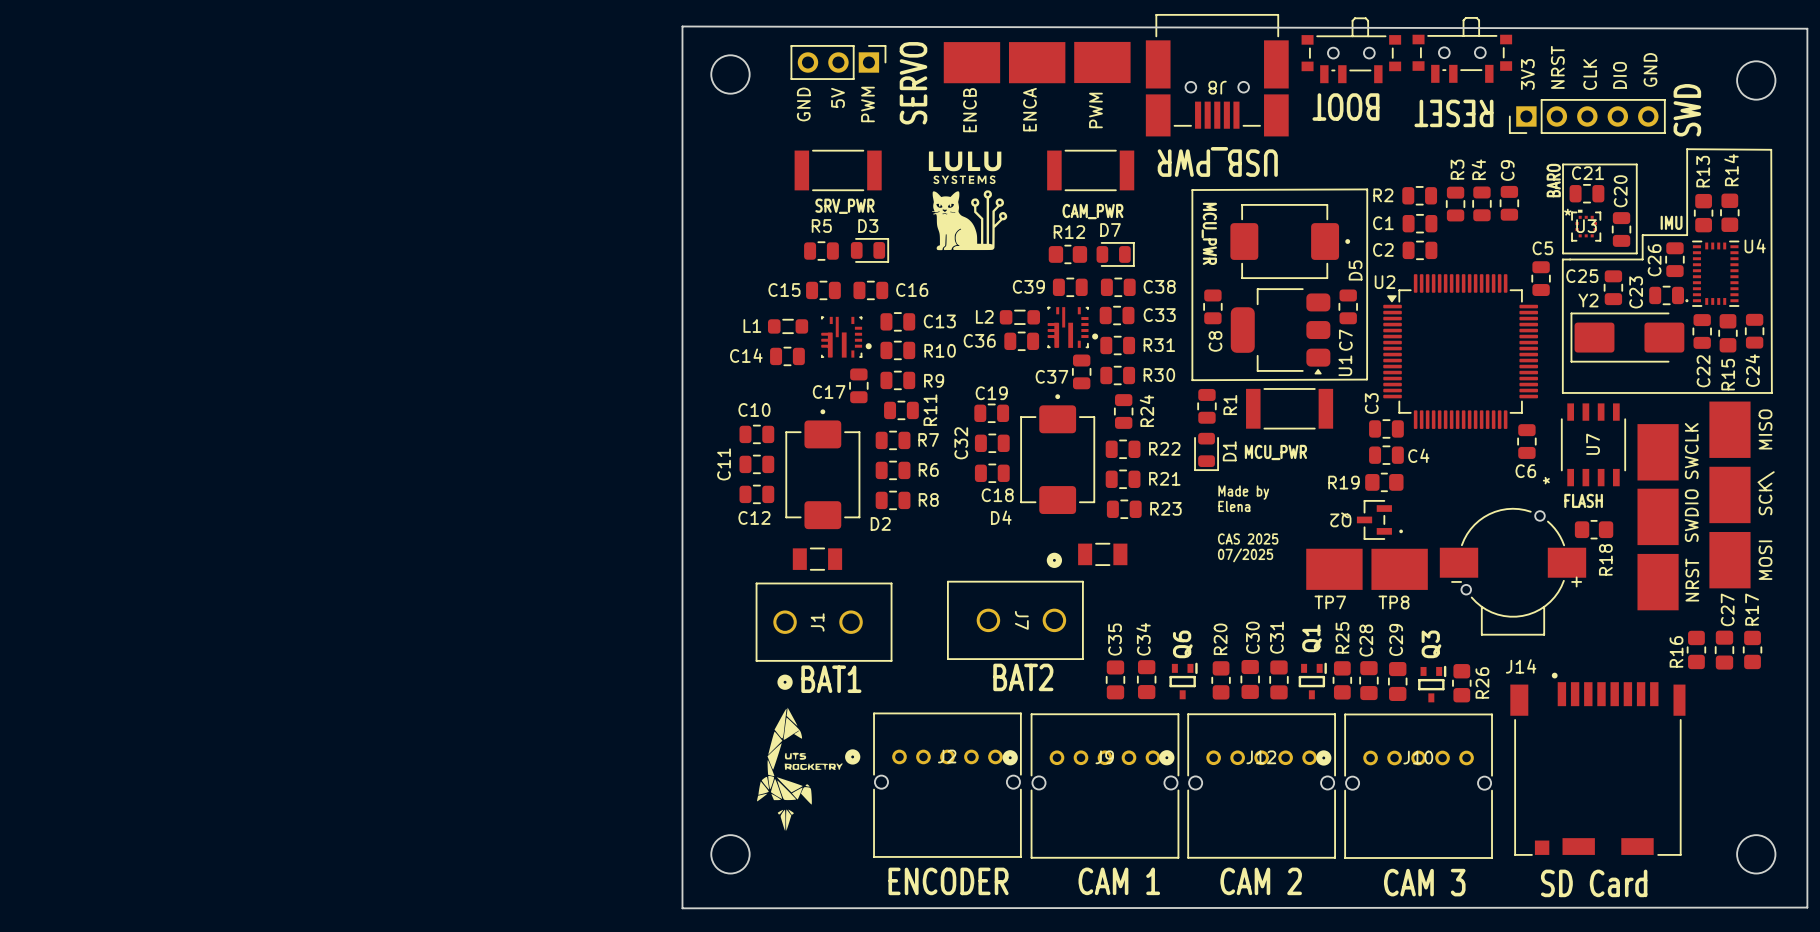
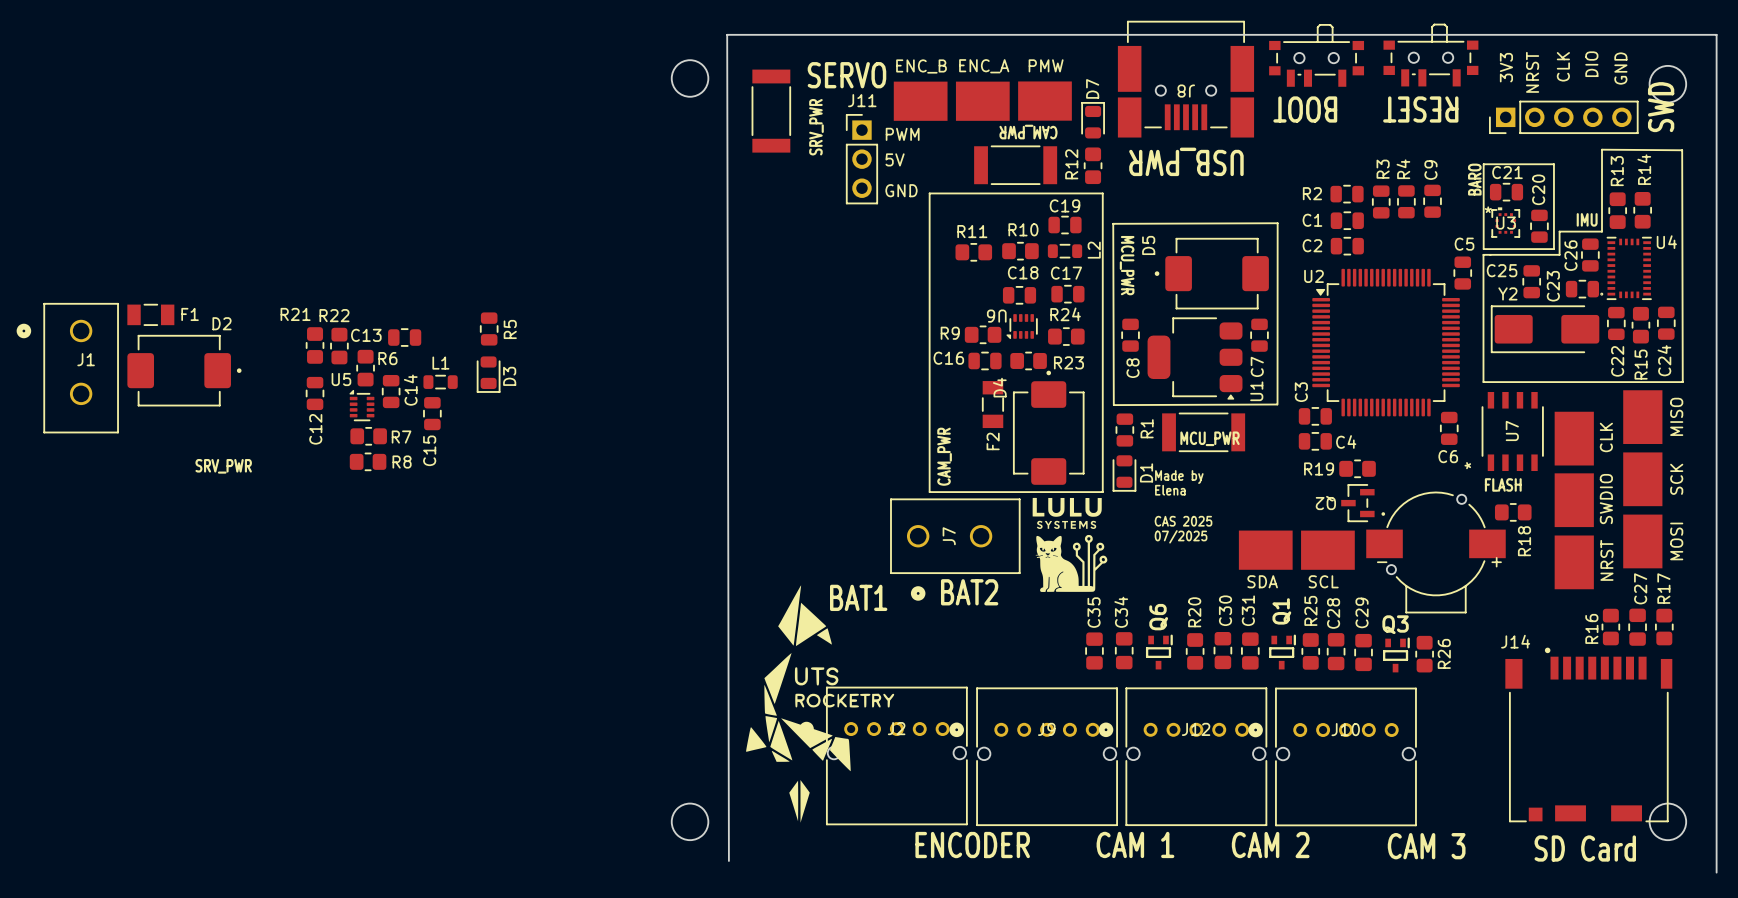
board edge: (1807, 28) (682, 26) (682, 908) (1807, 907) -> (1716, 34) (727, 34) (728, 861)
part position: (1351, 50) -> (1316, 55)
part: (1462, 50) -> none
part: none -> (1430, 55)
part: (838, 62) -> none
ENCB: (971, 62) -> none
ENCA: (1037, 62) -> none
PWM: (1102, 62) -> none
text position: NRST (1557, 67) -> NRST (1532, 72)
text position: GND (1650, 69) -> GND (1620, 68)
text position: 3V3 (1527, 74) -> 3V3 (1506, 67)
text position: CLK (1590, 74) -> CLK (1563, 66)
J8 position: (1217, 75) -> (1185, 79)
text position: DIO (1620, 75) -> DIO (1591, 64)
text rotation: 0° (913, 83) -> 90° clockwise (846, 75)
text rotation: 0° (838, 97) -> 90° clockwise (895, 159)
text position: 5V (838, 97) -> 5V (895, 159)
ENC_B: none -> (920, 101)
ENC_A: none -> (982, 101)
PMW: none -> (1044, 101)
text rotation: 0° (803, 104) -> 90° clockwise (901, 190)
text position: GND (803, 104) -> GND (901, 190)
text rotation: 0° (867, 104) -> 90° clockwise (902, 134)
text position: PWM (867, 104) -> PWM (902, 134)
text position: BOOT (1345, 107) -> BOOT (1305, 109)
text position: SWD (1687, 110) -> SWD (1661, 107)
text position: RESET (1453, 113) -> RESET (1420, 109)
part position: (1587, 116) -> (1563, 117)
drawing: [928, 151, 1008, 251] -> none
J11: none -> (861, 159)
text position: USB_PWR (1217, 161) -> USB_PWR (1186, 161)
part rotation: 0° (838, 170) -> 90° clockwise (771, 111)
part position: (838, 170) -> (771, 111)
part position: (1090, 170) -> (1015, 165)
line: none -> (929, 193) (1102, 193) (1102, 492) (929, 492) (929, 193)
text rotation: 0° (844, 206) -> 90° counterclockwise (816, 127)
text position: SRV_PWR (844, 206) -> SRV_PWR (816, 127)
text rotation: 0° (1092, 211) -> 180° (1028, 132)
text position: CAM_PWR (1092, 211) -> CAM_PWR (1028, 132)
R12 name position: R12 (1069, 232) -> R12 (1071, 164)
text position: MCU_PWR (1209, 233) -> MCU_PWR (1127, 265)
D5 rotation: 0° (1290, 241) -> 180° (1211, 273)
D3 rotation: 0° (869, 250) -> 90° clockwise (488, 374)
D3 position: (869, 250) -> (488, 374)
R5 rotation: 0° (821, 251) -> 90° clockwise (489, 328)
R5 position: (821, 251) -> (489, 328)
R12 rotation: 0° (1067, 254) -> 90° clockwise (1093, 165)
R12 position: (1067, 254) -> (1093, 165)
D7 rotation: 0° (1115, 254) -> 90° counterclockwise (1093, 120)
D7 position: (1115, 254) -> (1093, 120)
C39: (1070, 287) -> none
C38: (1118, 287) -> none
C15 name position: C15 (784, 290) -> C15 (429, 450)
C15 rotation: 0° (823, 290) -> 90° clockwise (432, 413)
C15 position: (823, 290) -> (432, 413)
C16 position: (870, 290) -> (985, 360)
C16 name position: C16 (912, 290) -> C16 (948, 358)
C8 position: (1212, 306) -> (1130, 335)
C7 position: (1348, 306) -> (1259, 335)
L2 footprint: [999, 309, 1040, 325] -> [1047, 244, 1083, 259]
C33: (1117, 315) -> none
L2 name position: L2 (984, 316) -> L2 (1094, 250)
L1 footprint: [767, 319, 809, 334] -> [423, 375, 458, 390]
C13 position: (897, 321) -> (404, 337)
C13 name position: C13 (939, 321) -> C13 (366, 335)
F1: none -> (150, 314)
L1 name position: L1 (752, 325) -> L1 (440, 363)
part: (1072, 327) -> none
U1 position: (1280, 331) -> (1195, 358)
U6: none -> (1022, 326)
part: (846, 337) -> none
R10 footprint: [880, 340, 916, 360] -> [1002, 242, 1039, 261]
C36: (1021, 341) -> none
R31: (1117, 345) -> none
R10 name position: R10 (940, 350) -> R10 (1023, 229)
C14 name position: C14 (746, 355) -> C14 (410, 390)
C14 rotation: 0° (787, 356) -> 90° clockwise (391, 391)
C14 position: (787, 356) -> (391, 391)
R9 footprint: [880, 370, 916, 390] -> [964, 325, 1002, 344]
C37: (1081, 371) -> none
R30: (1117, 375) -> none
line: (1366, 379) (1192, 380) (1192, 190) (1367, 189) (1367, 379) -> none
R9 name position: R9 (934, 380) -> R9 (950, 333)
C17 rotation: 0° (858, 385) -> 90° clockwise (1067, 294)
C17 position: (858, 385) -> (1067, 294)
R24 footprint: [1114, 394, 1134, 429] -> [1048, 327, 1085, 346]
R11 footprint: [884, 400, 919, 420] -> [955, 243, 993, 262]
R1 position: (1206, 406) -> (1124, 430)
part position: (1289, 408) -> (1203, 432)
R11 name position: R11 (930, 410) -> R11 (972, 231)
R24 name position: R24 (1146, 410) -> R24 (1065, 314)
C19 position: (991, 413) -> (1065, 225)
F2: none -> (992, 404)
line: none -> (1277, 404) (1113, 405) (1113, 223) (1277, 223) (1277, 404)
U5: none -> (361, 405)
R7 footprint: [875, 430, 911, 450] -> [350, 427, 387, 446]
C10: (756, 434) -> none
R22 footprint: [1105, 439, 1141, 459] -> [330, 327, 349, 365]
C32: (992, 443) -> none
R22 name position: R22 (1164, 448) -> R22 (334, 315)
D1 position: (1206, 451) -> (1124, 473)
SWCLK name: SWCLK (1691, 451) -> CLK (1606, 437)
D4 position: (1057, 454) -> (1048, 427)
R6 footprint: [875, 460, 911, 480] -> [356, 349, 375, 387]
C11: (756, 464) -> none
D2 rotation: 0° (822, 469) -> 90° clockwise (184, 370)
D2 position: (822, 469) -> (184, 370)
R21 footprint: [1105, 469, 1141, 489] -> [305, 327, 325, 364]
text: none -> CAM_PWR (944, 456)
C18 position: (992, 473) -> (1019, 295)
R21 name position: R21 (1164, 478) -> R21 (295, 314)
text: none -> SRV_PWR (223, 466)
R19 position: (1384, 482) -> (1357, 468)
R8 footprint: [875, 490, 911, 510] -> [349, 452, 387, 471]
SCK\ name: SCK\ (1766, 493) -> SCK (1676, 479)
C12 rotation: 0° (756, 494) -> 90° clockwise (315, 393)
C12 position: (756, 494) -> (315, 393)
C18 name position: C18 (997, 495) -> C18 (1023, 272)
R23 footprint: [1106, 499, 1142, 519] -> [1010, 351, 1047, 371]
drawing: none -> [1032, 497, 1108, 592]
D4 name rotation: 0° (1001, 517) -> 90° counterclockwise (999, 387)
D4 name position: D4 (1001, 517) -> D4 (999, 387)
Q2 position: (1379, 519) -> (1363, 503)
D2 name position: D2 (880, 523) -> D2 (222, 323)
part: (1102, 554) -> none
part: (817, 559) -> none
TP7 name: TP7 (1330, 602) -> SDA (1262, 581)
TP8 name: TP8 (1394, 602) -> SCL (1323, 581)
drawing: none -> [746, 585, 895, 823]
J7 rotation: 0° (1015, 606) -> 180° (955, 549)
J1 rotation: 0° (824, 636) -> 90° clockwise (67, 368)
J1 position: (824, 636) -> (67, 368)
Q3 name rotation: 0° (1431, 644) -> 90° clockwise (1395, 624)
text position: BAT2 (1023, 677) -> BAT2 (969, 592)
text position: BAT1 (831, 679) -> BAT1 (858, 597)
C35 position: (1115, 679) -> (1094, 651)
C34 position: (1146, 679) -> (1124, 650)
C30 position: (1250, 679) -> (1222, 650)
C31 position: (1278, 679) -> (1250, 651)
Q6 position: (1183, 680) -> (1159, 652)
R20 position: (1221, 680) -> (1195, 651)
Q1 position: (1312, 680) -> (1282, 652)
R25 position: (1342, 680) -> (1310, 651)
C28 position: (1368, 680) -> (1336, 651)
C29 position: (1397, 681) -> (1363, 652)
R26 position: (1461, 683) -> (1424, 654)
Q3 position: (1432, 684) -> (1396, 654)
drawing: [757, 707, 843, 831] -> none
J14 position: (1597, 764) -> (1588, 734)
text position: ENCODER (948, 881) -> ENCODER (972, 845)
text position: CAM 1 (1119, 881) -> CAM 1 (1135, 844)
text position: CAM 2 (1261, 881) -> CAM 2 (1270, 845)
text position: CAM 3 (1424, 882) -> CAM 3 (1426, 846)
text position: SD Card (1594, 883) -> SD Card (1585, 848)

